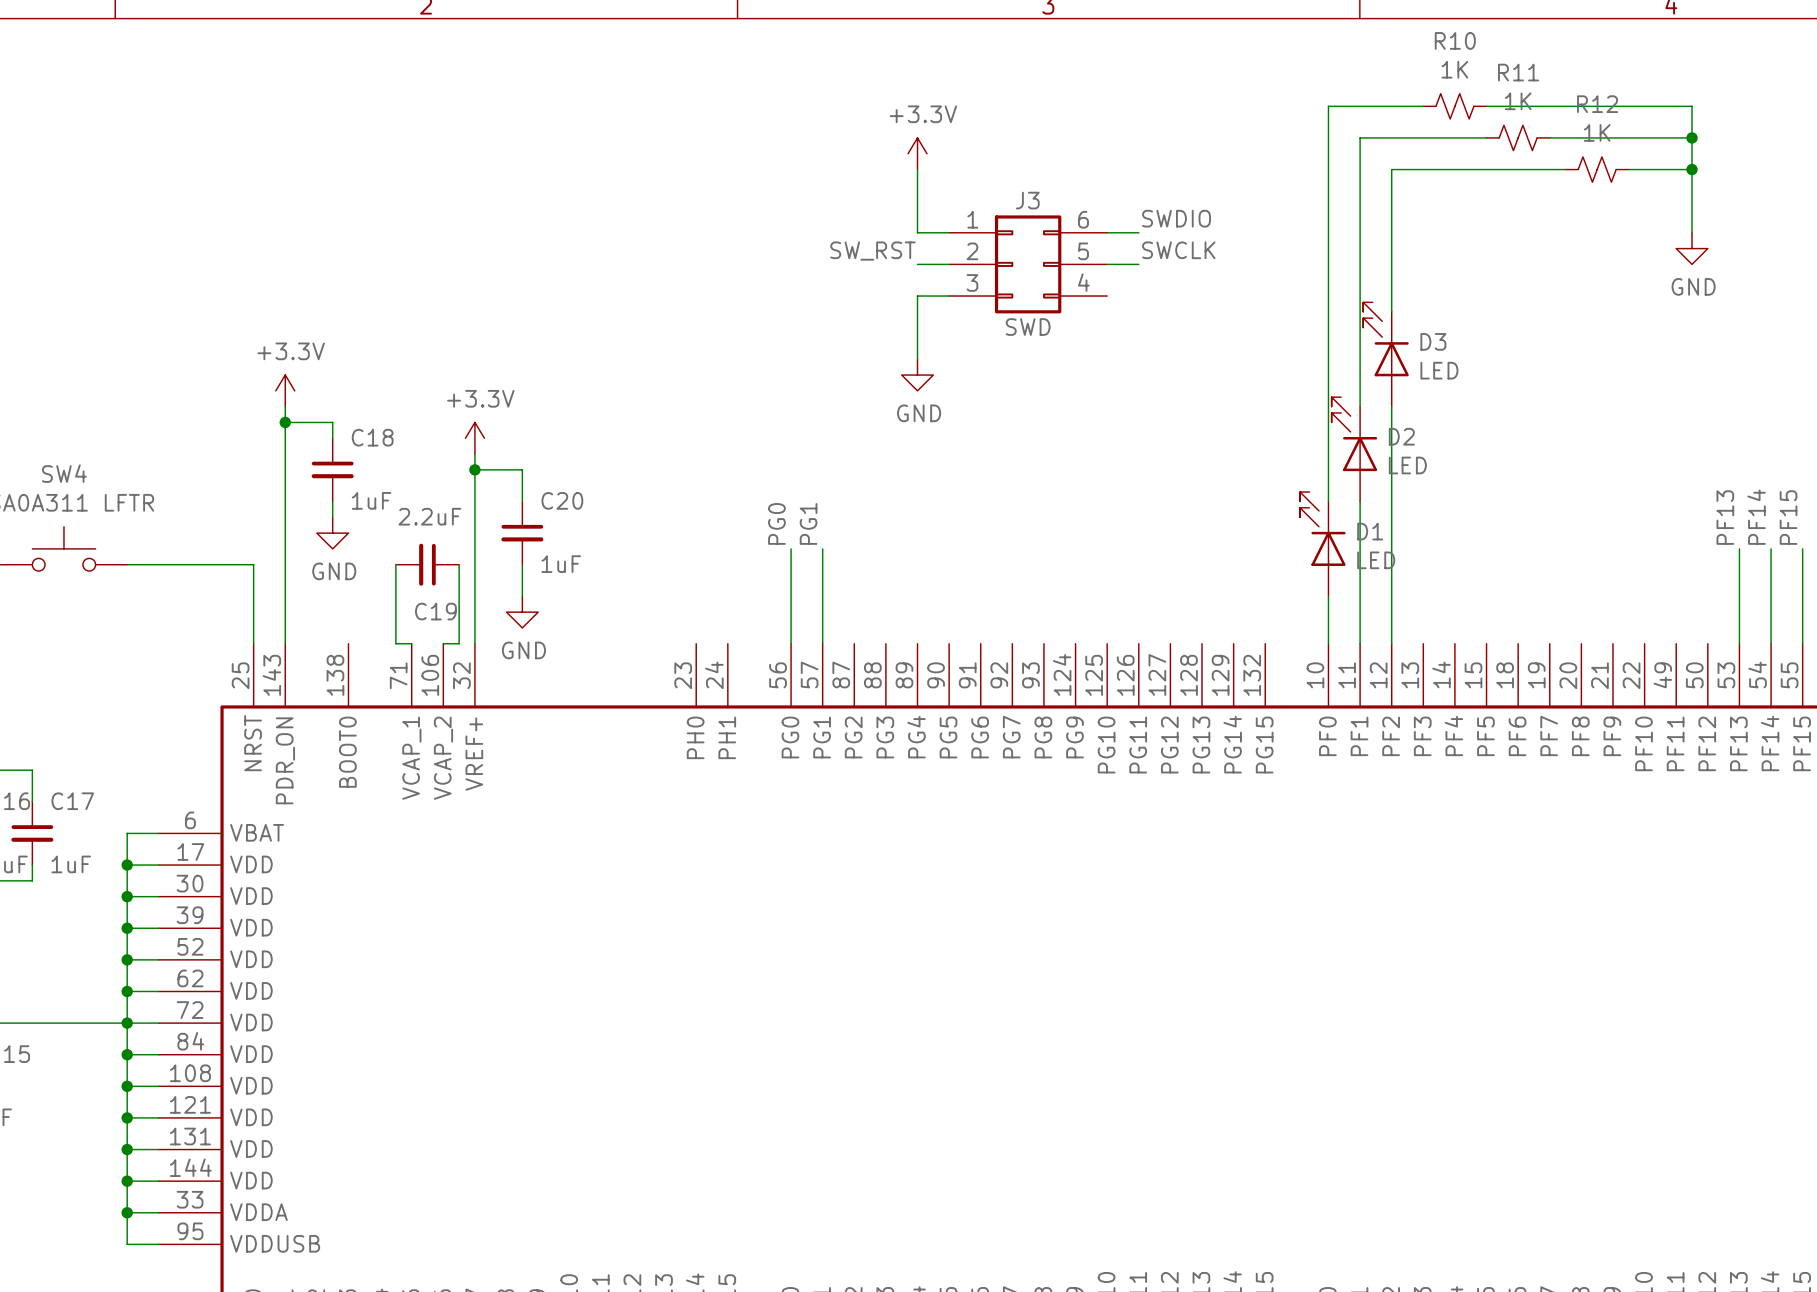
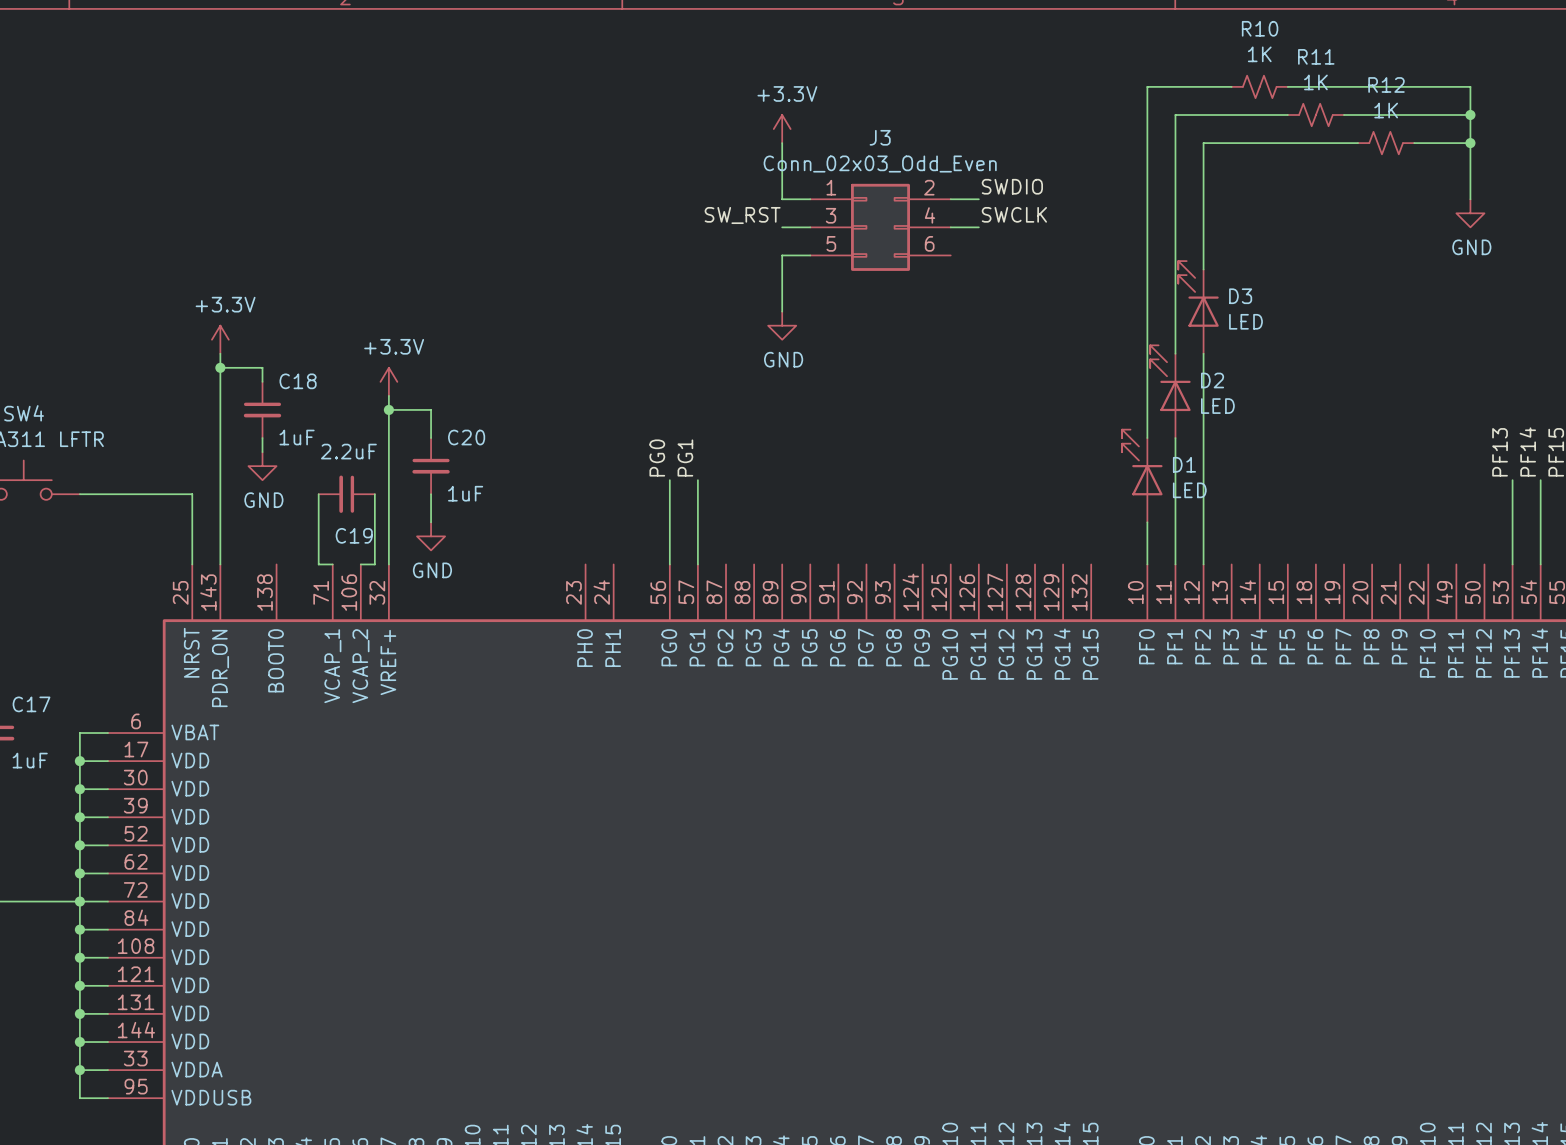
J3 name position: J3 (1027, 200) -> J3 (880, 137)
J3 pin number: 6 (1083, 219) -> 2 (929, 187)
J3 pin number: 2 (972, 251) -> 3 (831, 215)
J3 pin number: 5 (1083, 251) -> 4 (930, 215)
J3 pin number: 3 (972, 282) -> 5 (831, 243)
J3 pin number: 4 (1083, 282) -> 6 (929, 243)
J3 value: SWD (1028, 327) -> Conn_02x03_Odd_Even (880, 164)

